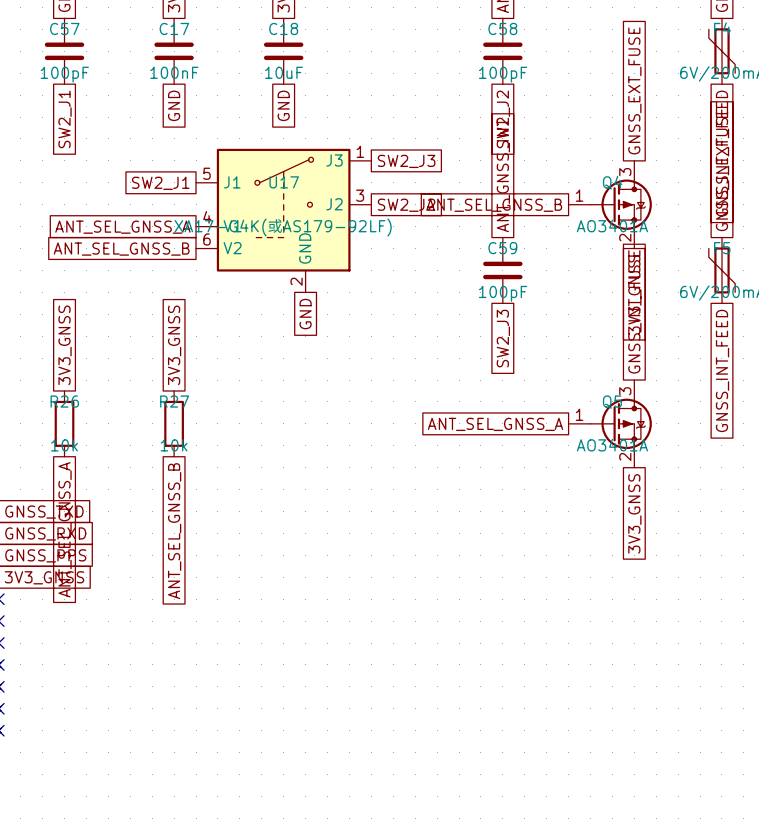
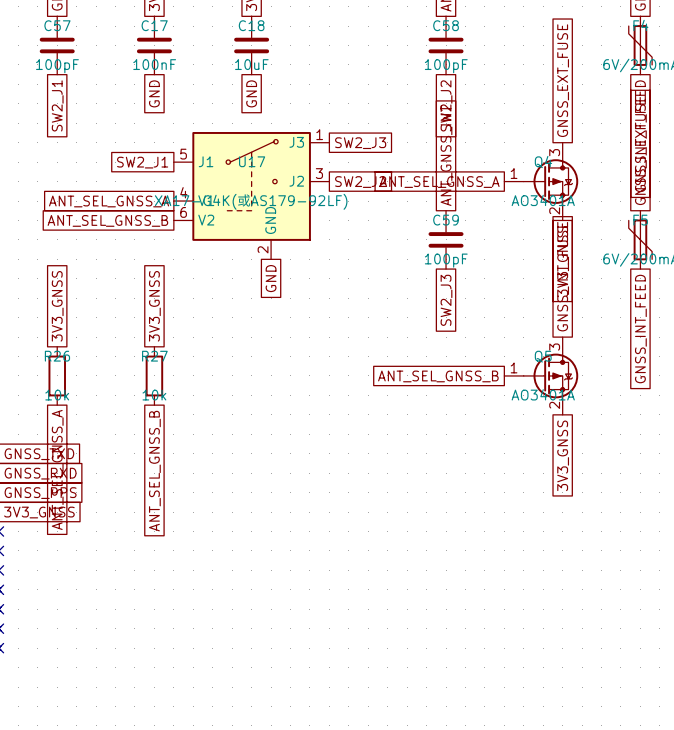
global label: ANT_SEL_GNSS_B (494, 205) -> ANT_SEL_GNSS_A (439, 182)
global label: ANT_SEL_GNSS_A (495, 424) -> ANT_SEL_GNSS_B (438, 376)

